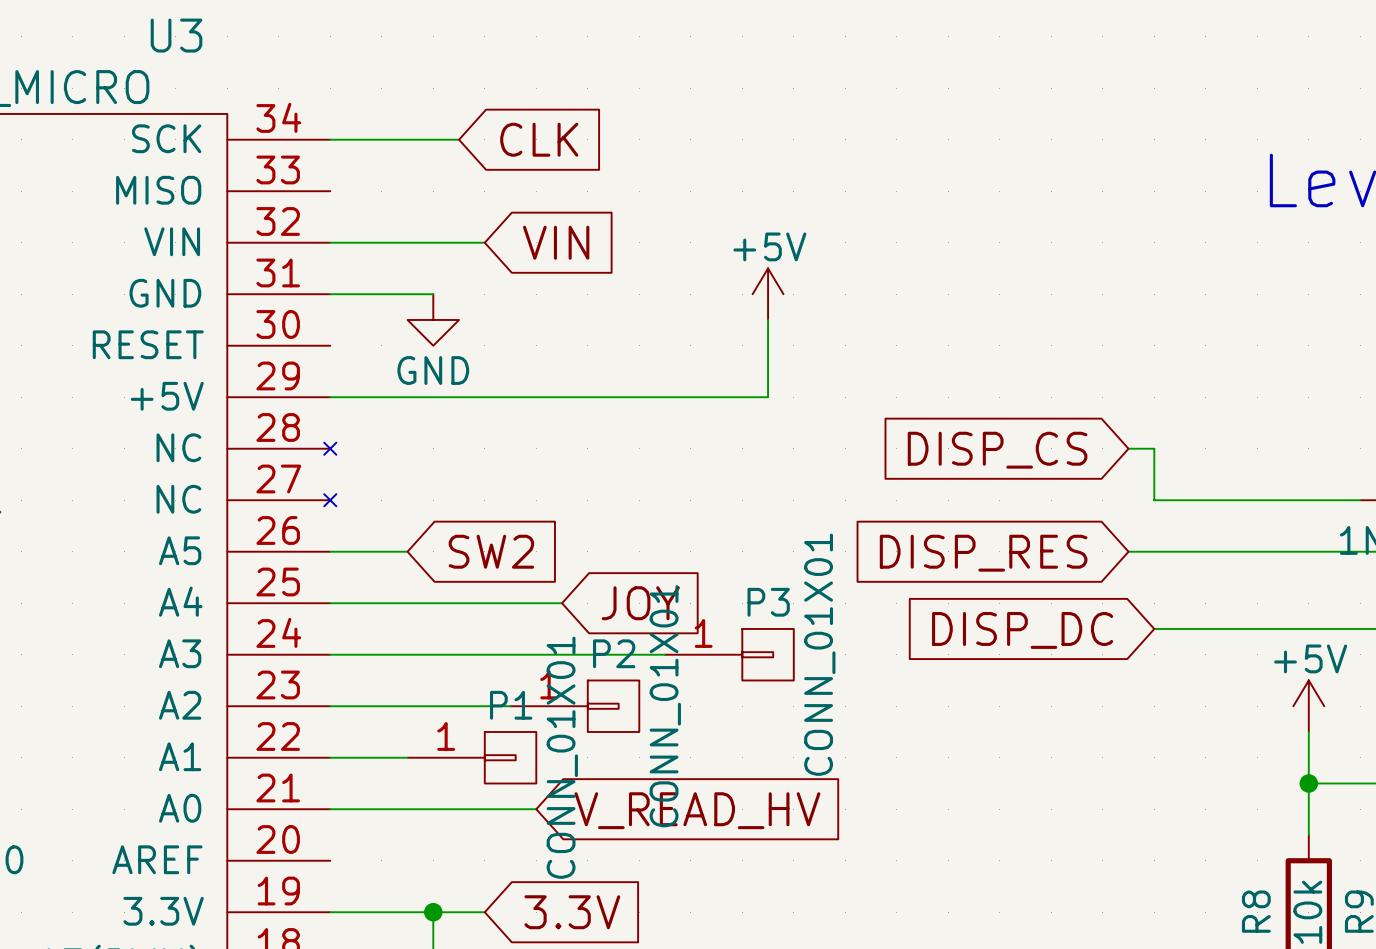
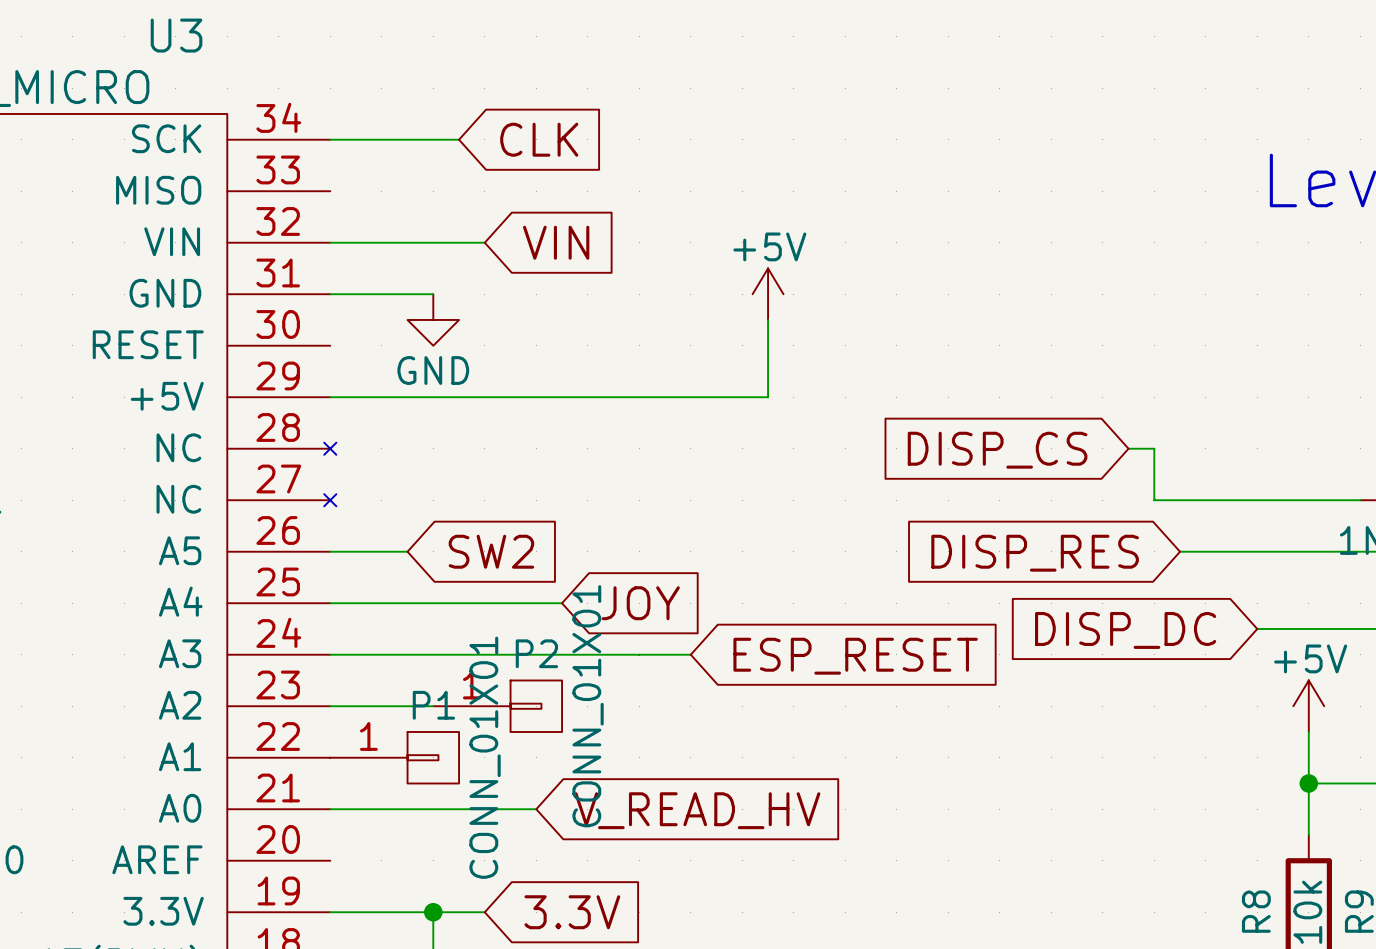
wire: (1128, 551) (1180, 551) -> none
global label position: DISP_RES (983, 553) -> DISP_RES (1035, 553)
wire: (1154, 628) (1257, 628) -> none
global label position: DISP_DC (1022, 630) -> DISP_DC (1125, 630)
P3: CONN_01X01 (729, 654) -> none
global label: none -> ESP_RESET (855, 656)
P2 position: (574, 706) -> (497, 706)
P1 position: (471, 757) -> (394, 757)

